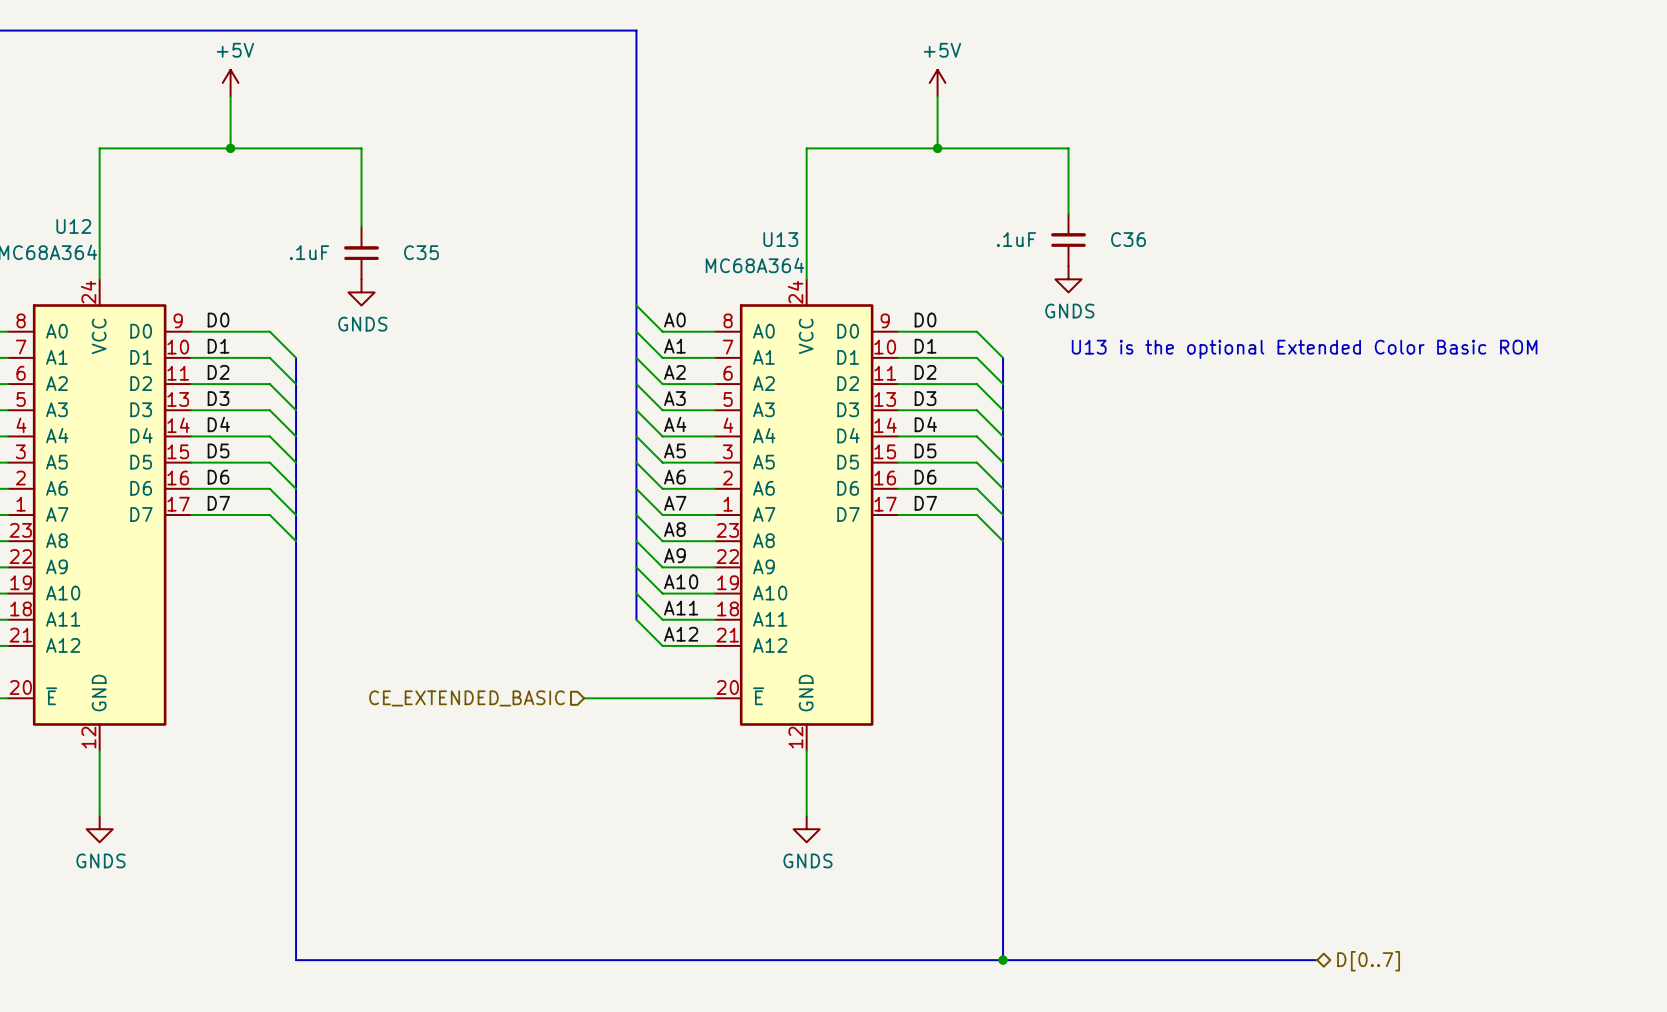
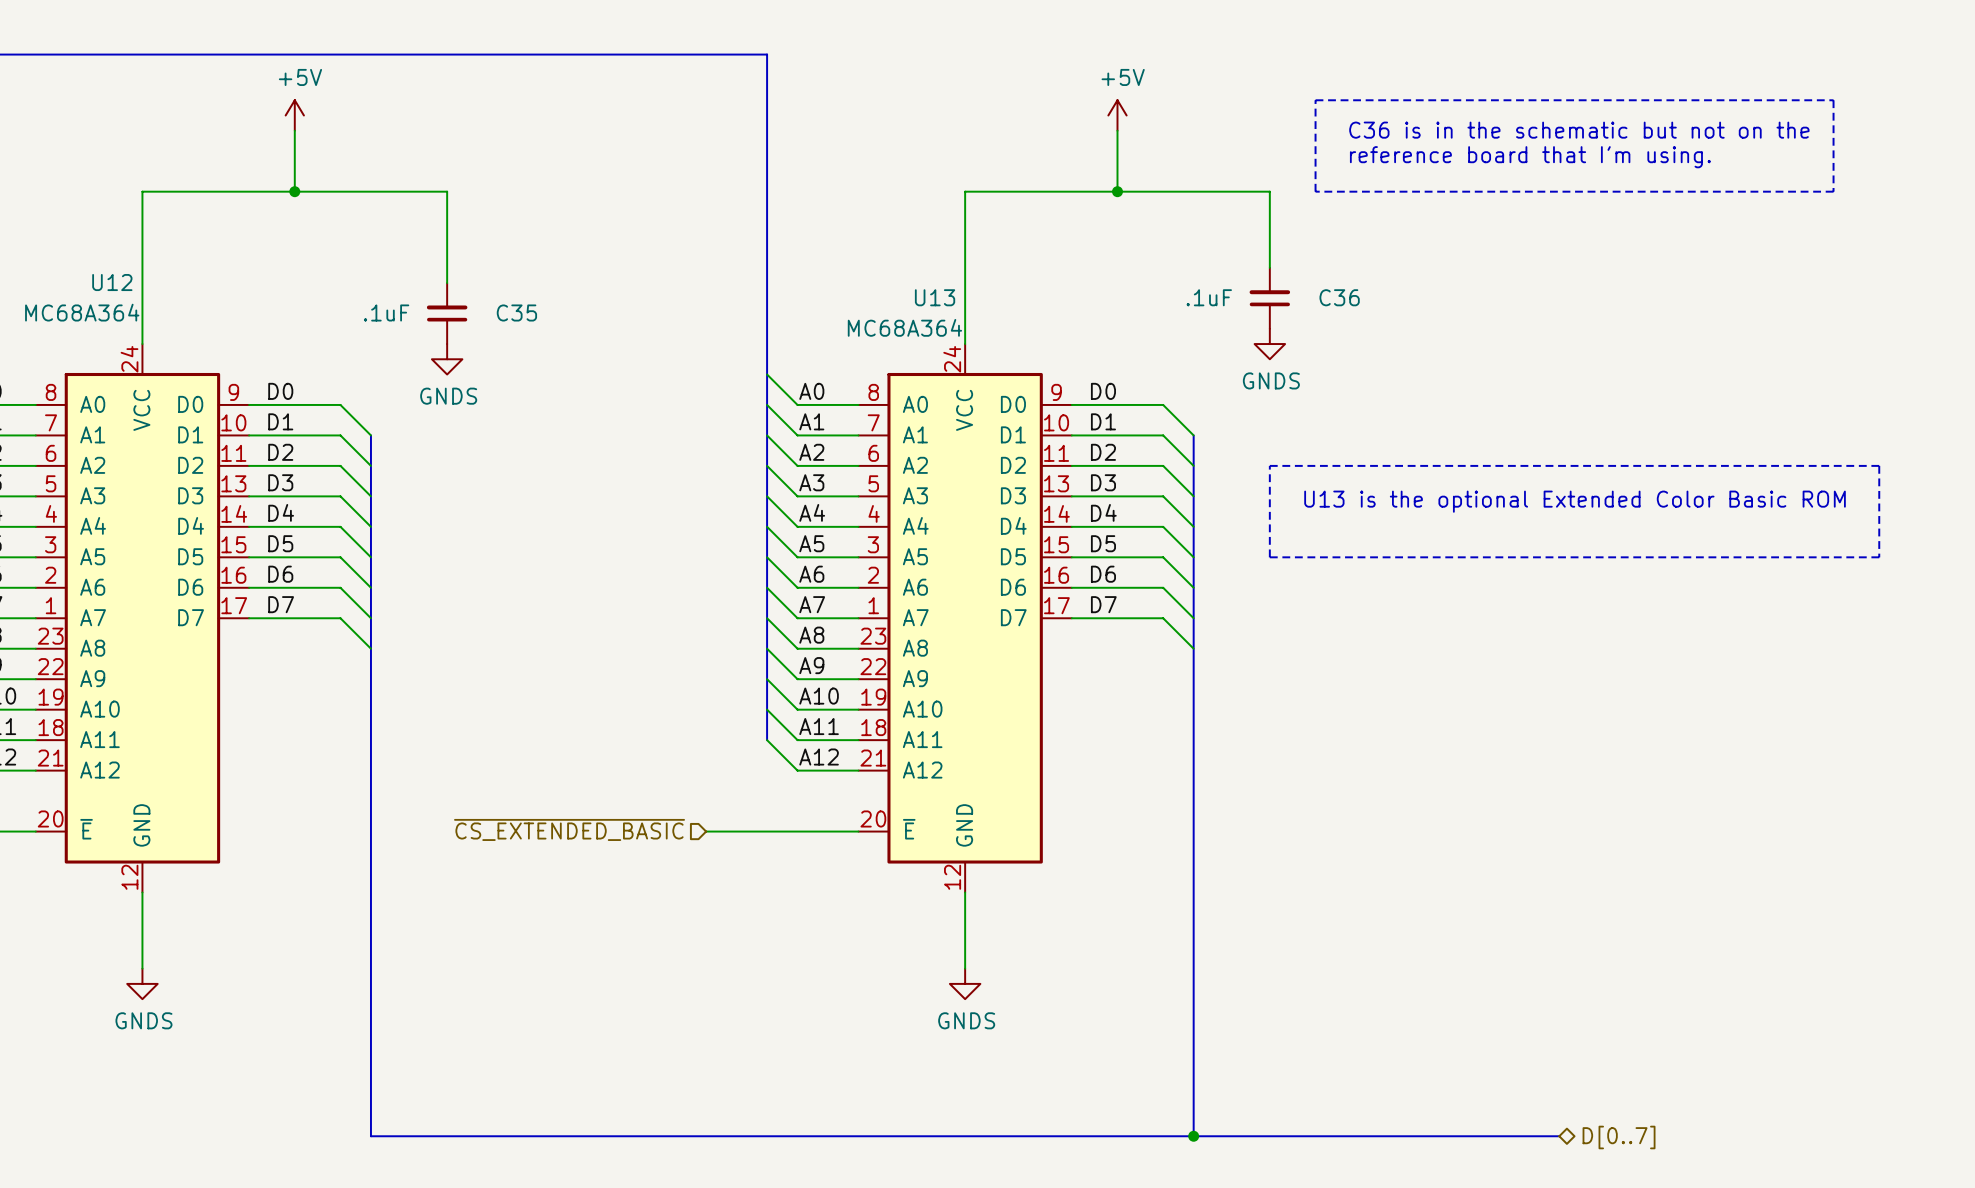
line: none -> (1315, 100) (1315, 191) (1833, 191) (1833, 100) (1315, 100)
text: none -> C36 is in the schematic but not on the (1579, 130)
text: none -> reference board that I'm using. (1530, 157)
text position: U13 is the optional Extended Color Basic ROM (1304, 349) -> U13 is the optional Extended Color Basic ROM (1575, 501)
line: none -> (1269, 465) (1269, 557) (1879, 557) (1879, 465) (1269, 465)
hierarchical label: CE_EXTENDED_BASIC (466, 698) -> ~{CS_EXTENDED_BASIC} (569, 829)

